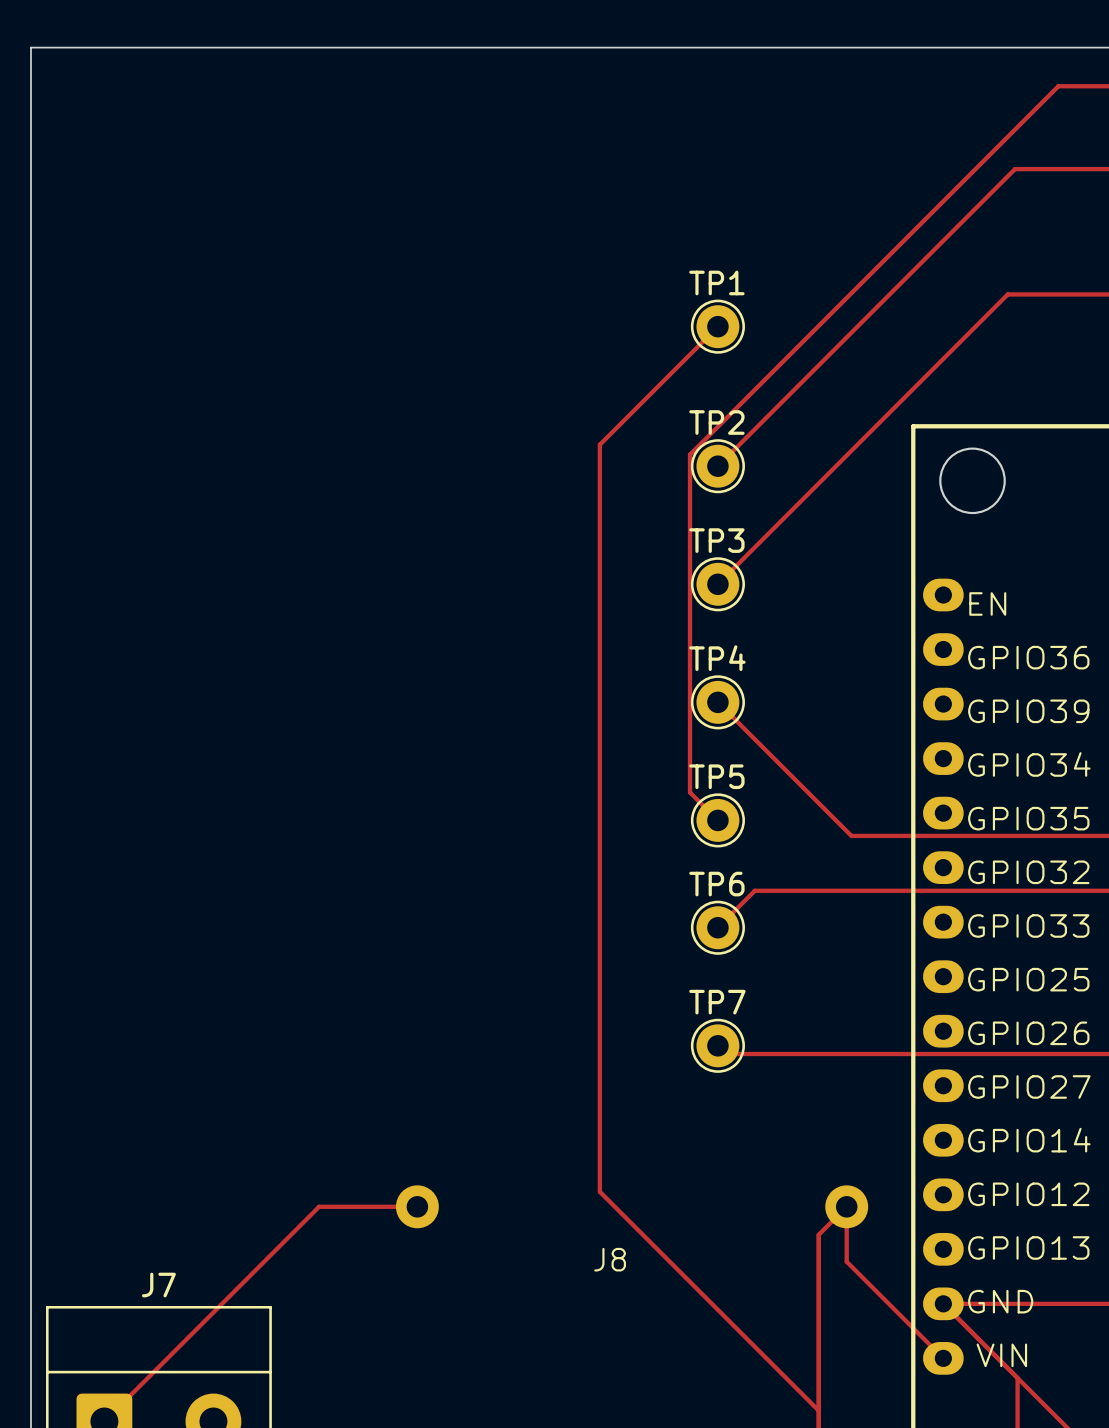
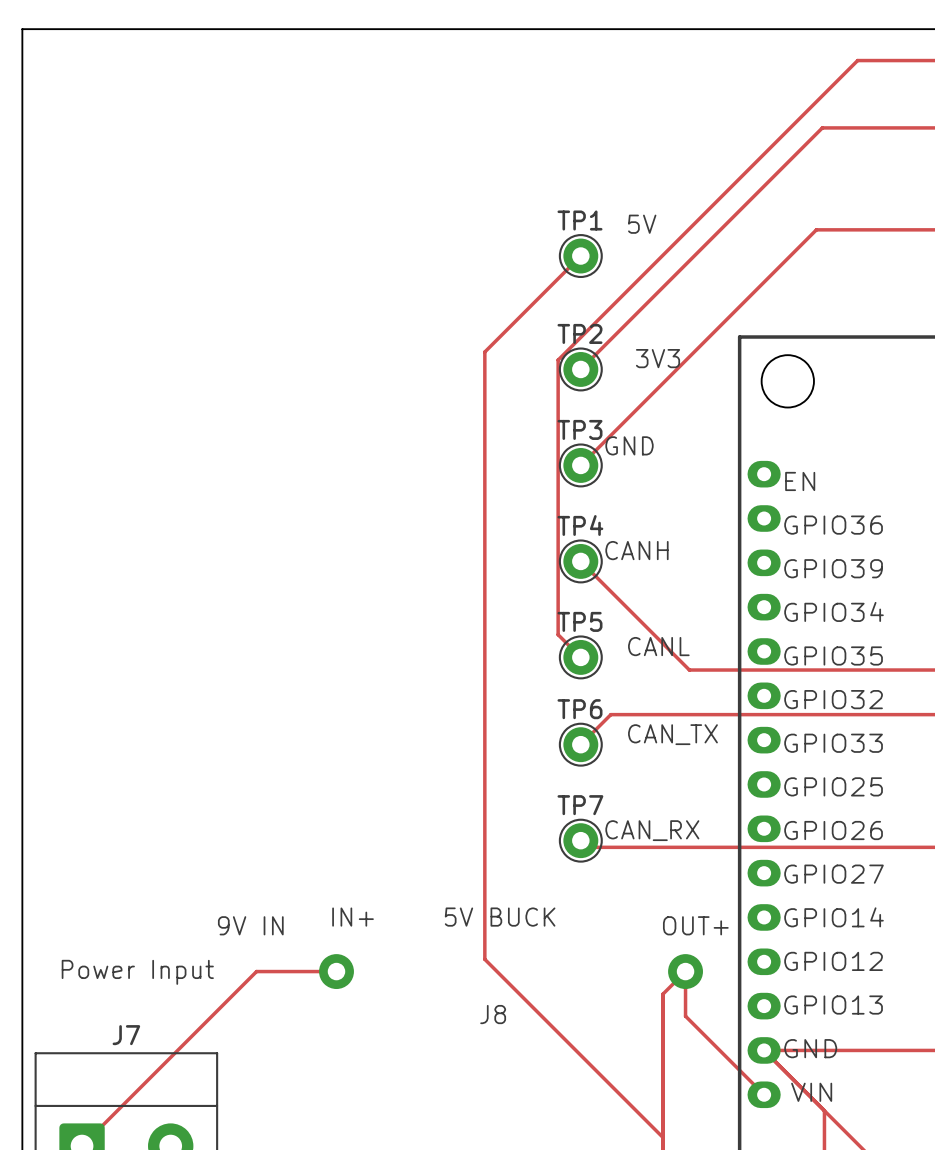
text: none -> 5V (642, 224)
text: none -> 3V3 (658, 358)
text: none -> GND (629, 445)
text: none -> CANH (636, 550)
text: none -> CANL (658, 646)
text: none -> CAN_TX (672, 734)
text: none -> CAN_RX (652, 830)
text: none -> IN+ (353, 917)
text: none -> 5V BUCK (500, 917)
text: none -> 9V IN (250, 925)
text: none -> OUT+ (695, 925)
text: none -> Power Input (137, 972)

